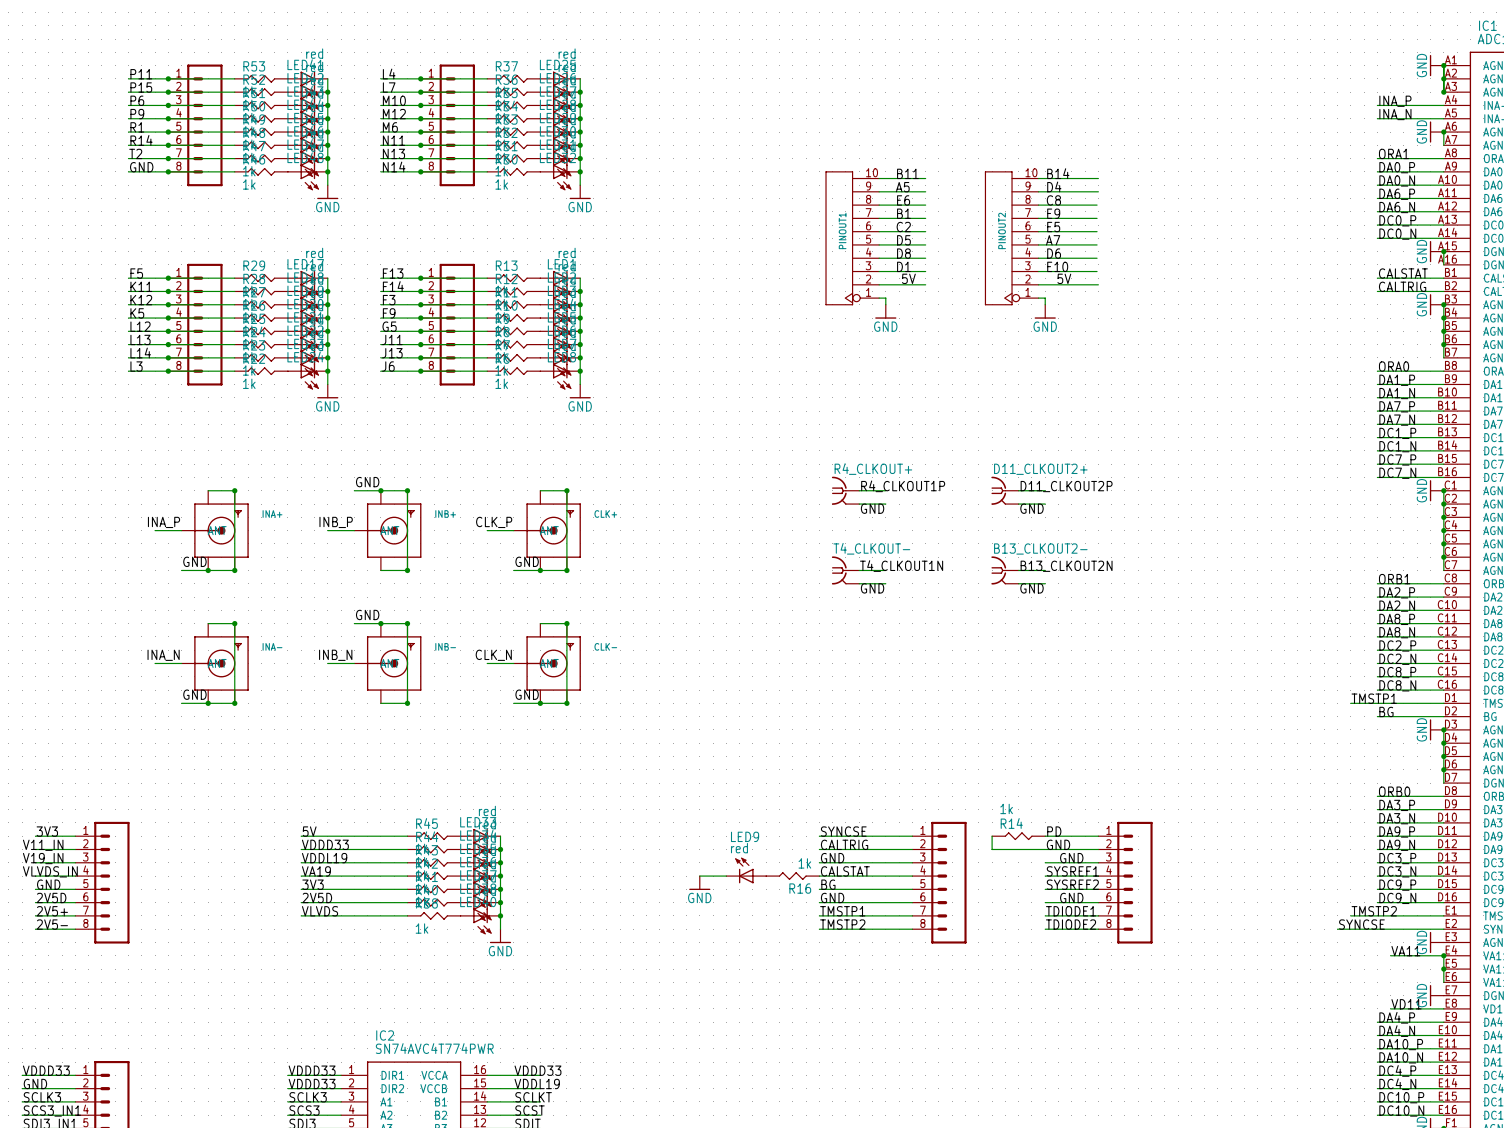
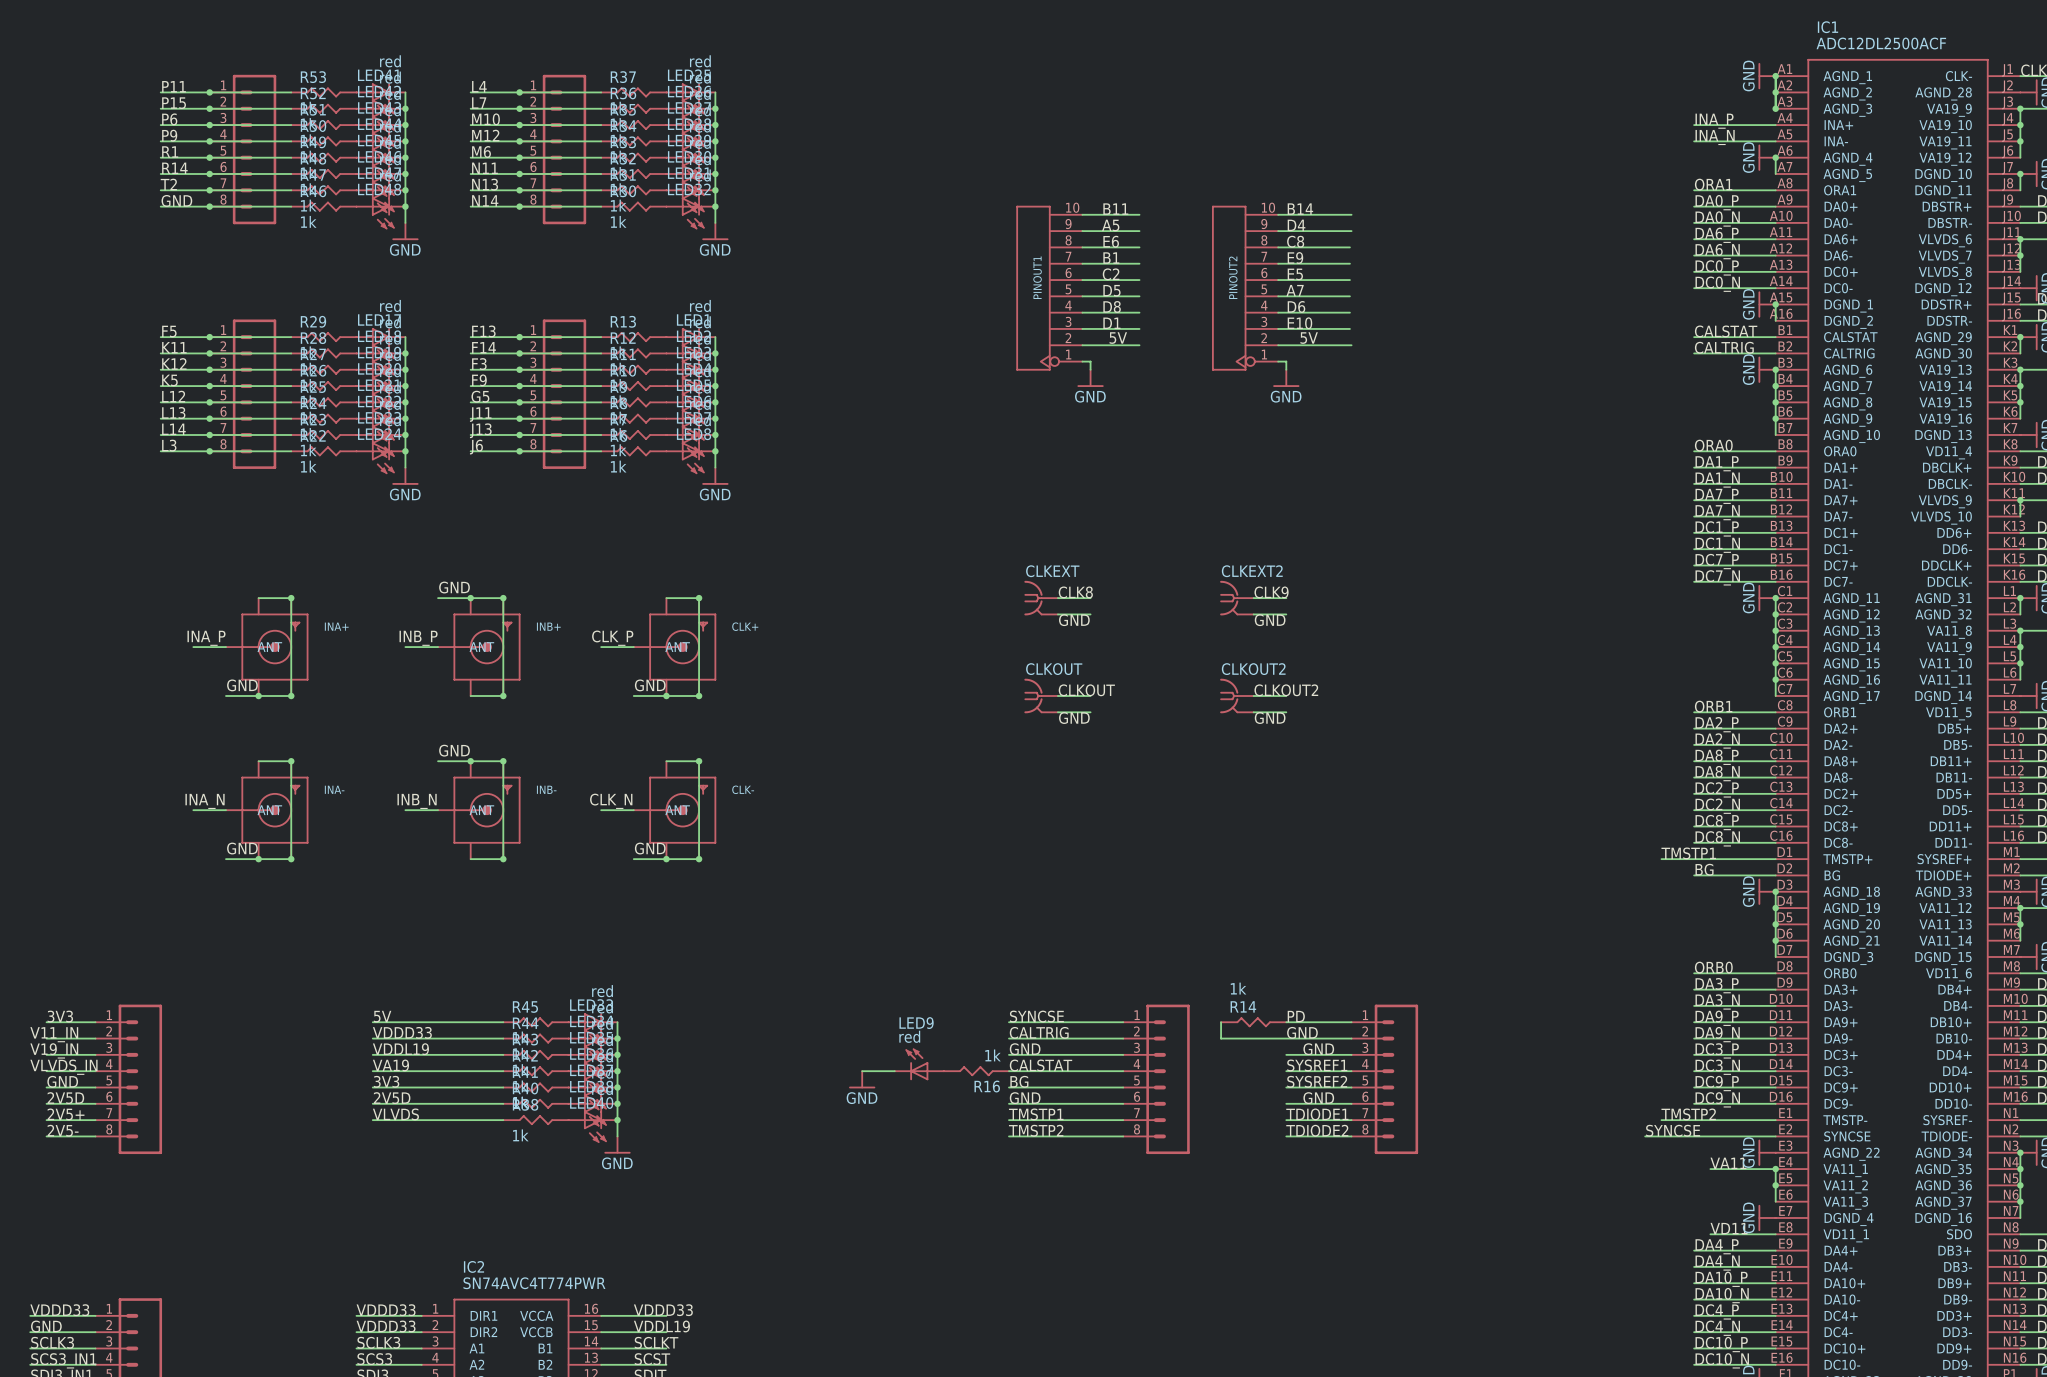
R4_CLKOUT+ name: R4_CLKOUT+ (873, 469) -> CLKEXT (1052, 571)
D11_CLKOUT2+ name: D11_CLKOUT2+ (1040, 469) -> CLKEXT2 (1252, 571)
label: R4_CLKOUT1P (903, 486) -> CLK8 (1075, 592)
label: D11_CLKOUT2P (1066, 486) -> CLK9 (1271, 592)
T4_CLKOUT- name: T4_CLKOUT- (871, 548) -> CLKOUT (1054, 669)
B13_CLKOUT2- name: B13_CLKOUT2- (1040, 548) -> CLKOUT2 (1253, 669)
label: T4_CLKOUT1N (901, 566) -> CLKOUT (1086, 690)
label: B13_CLKOUT2N (1066, 566) -> CLKOUT2 (1286, 690)

